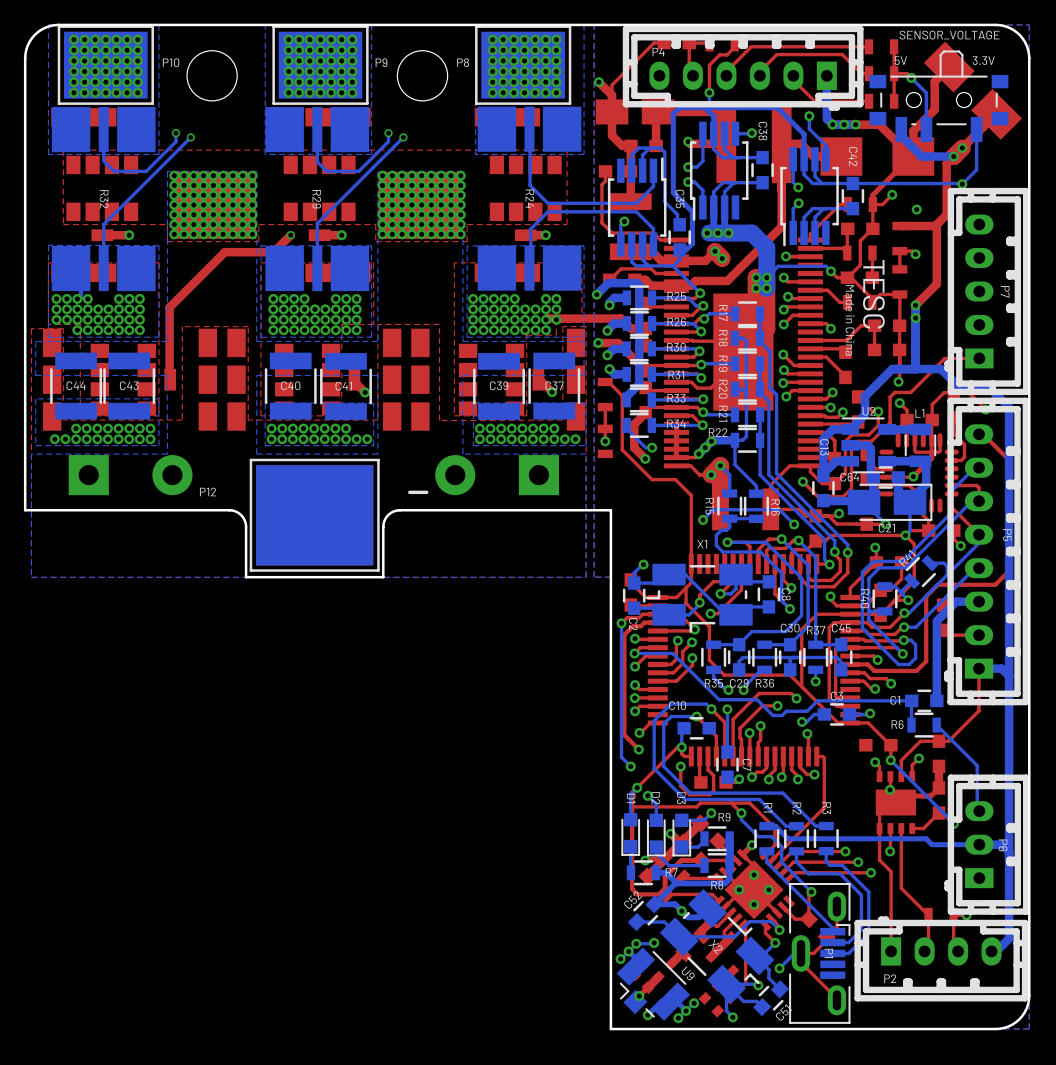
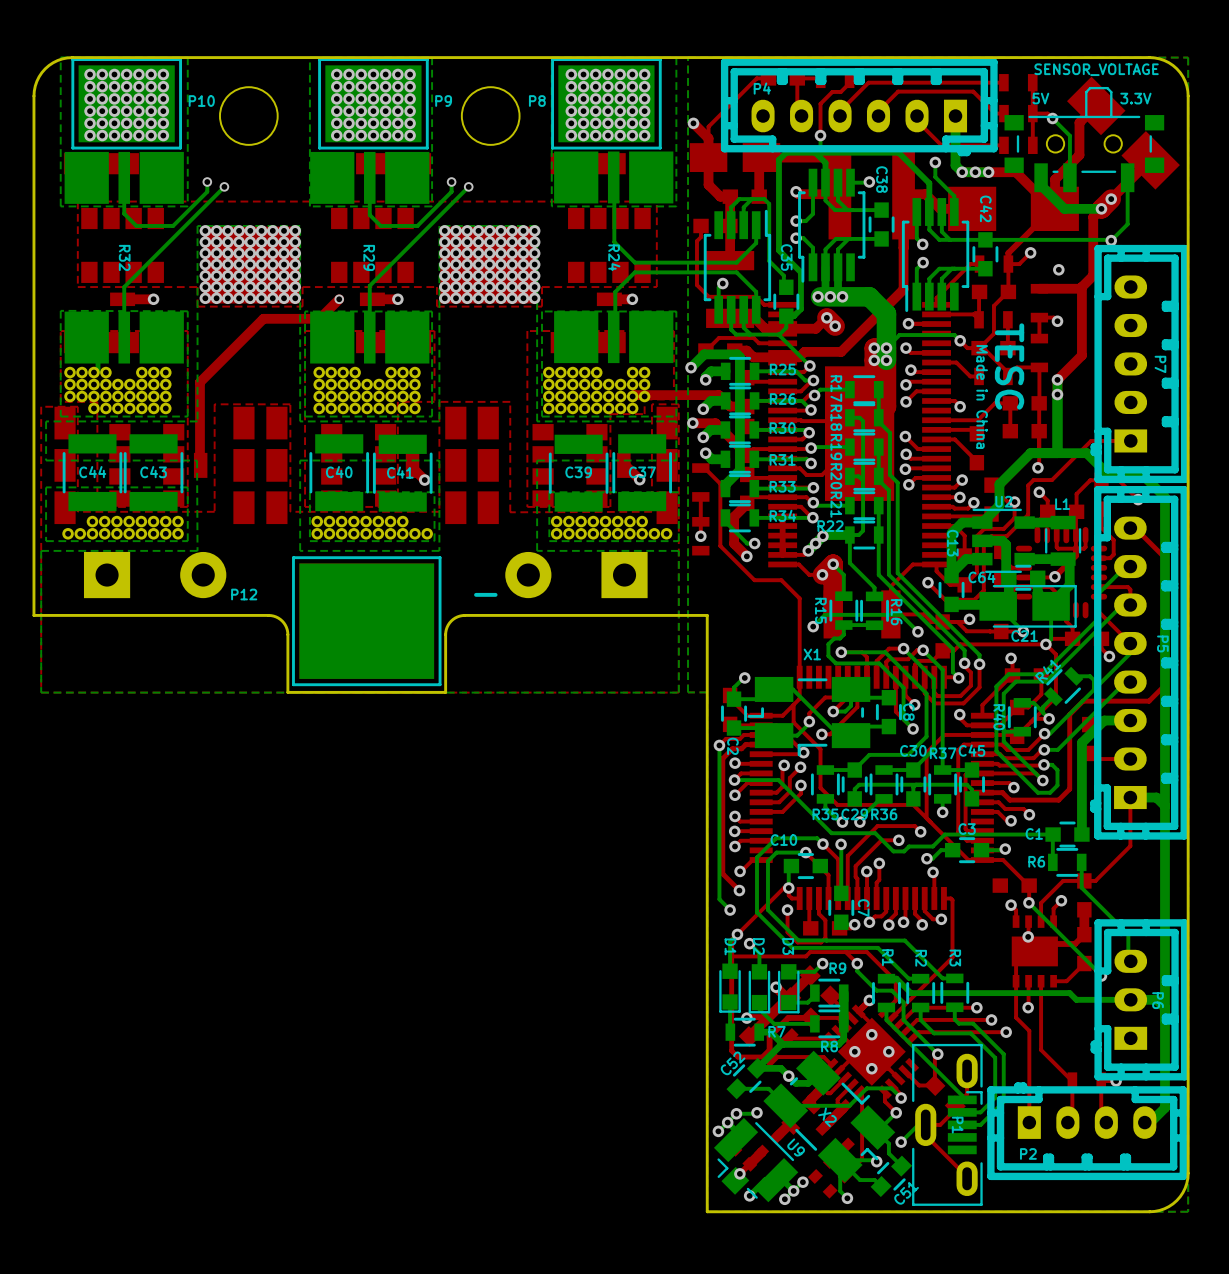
bottom track: (936, 725) (977, 765) (977, 787) -> (1081, 862) (1081, 887) (1128, 934)

